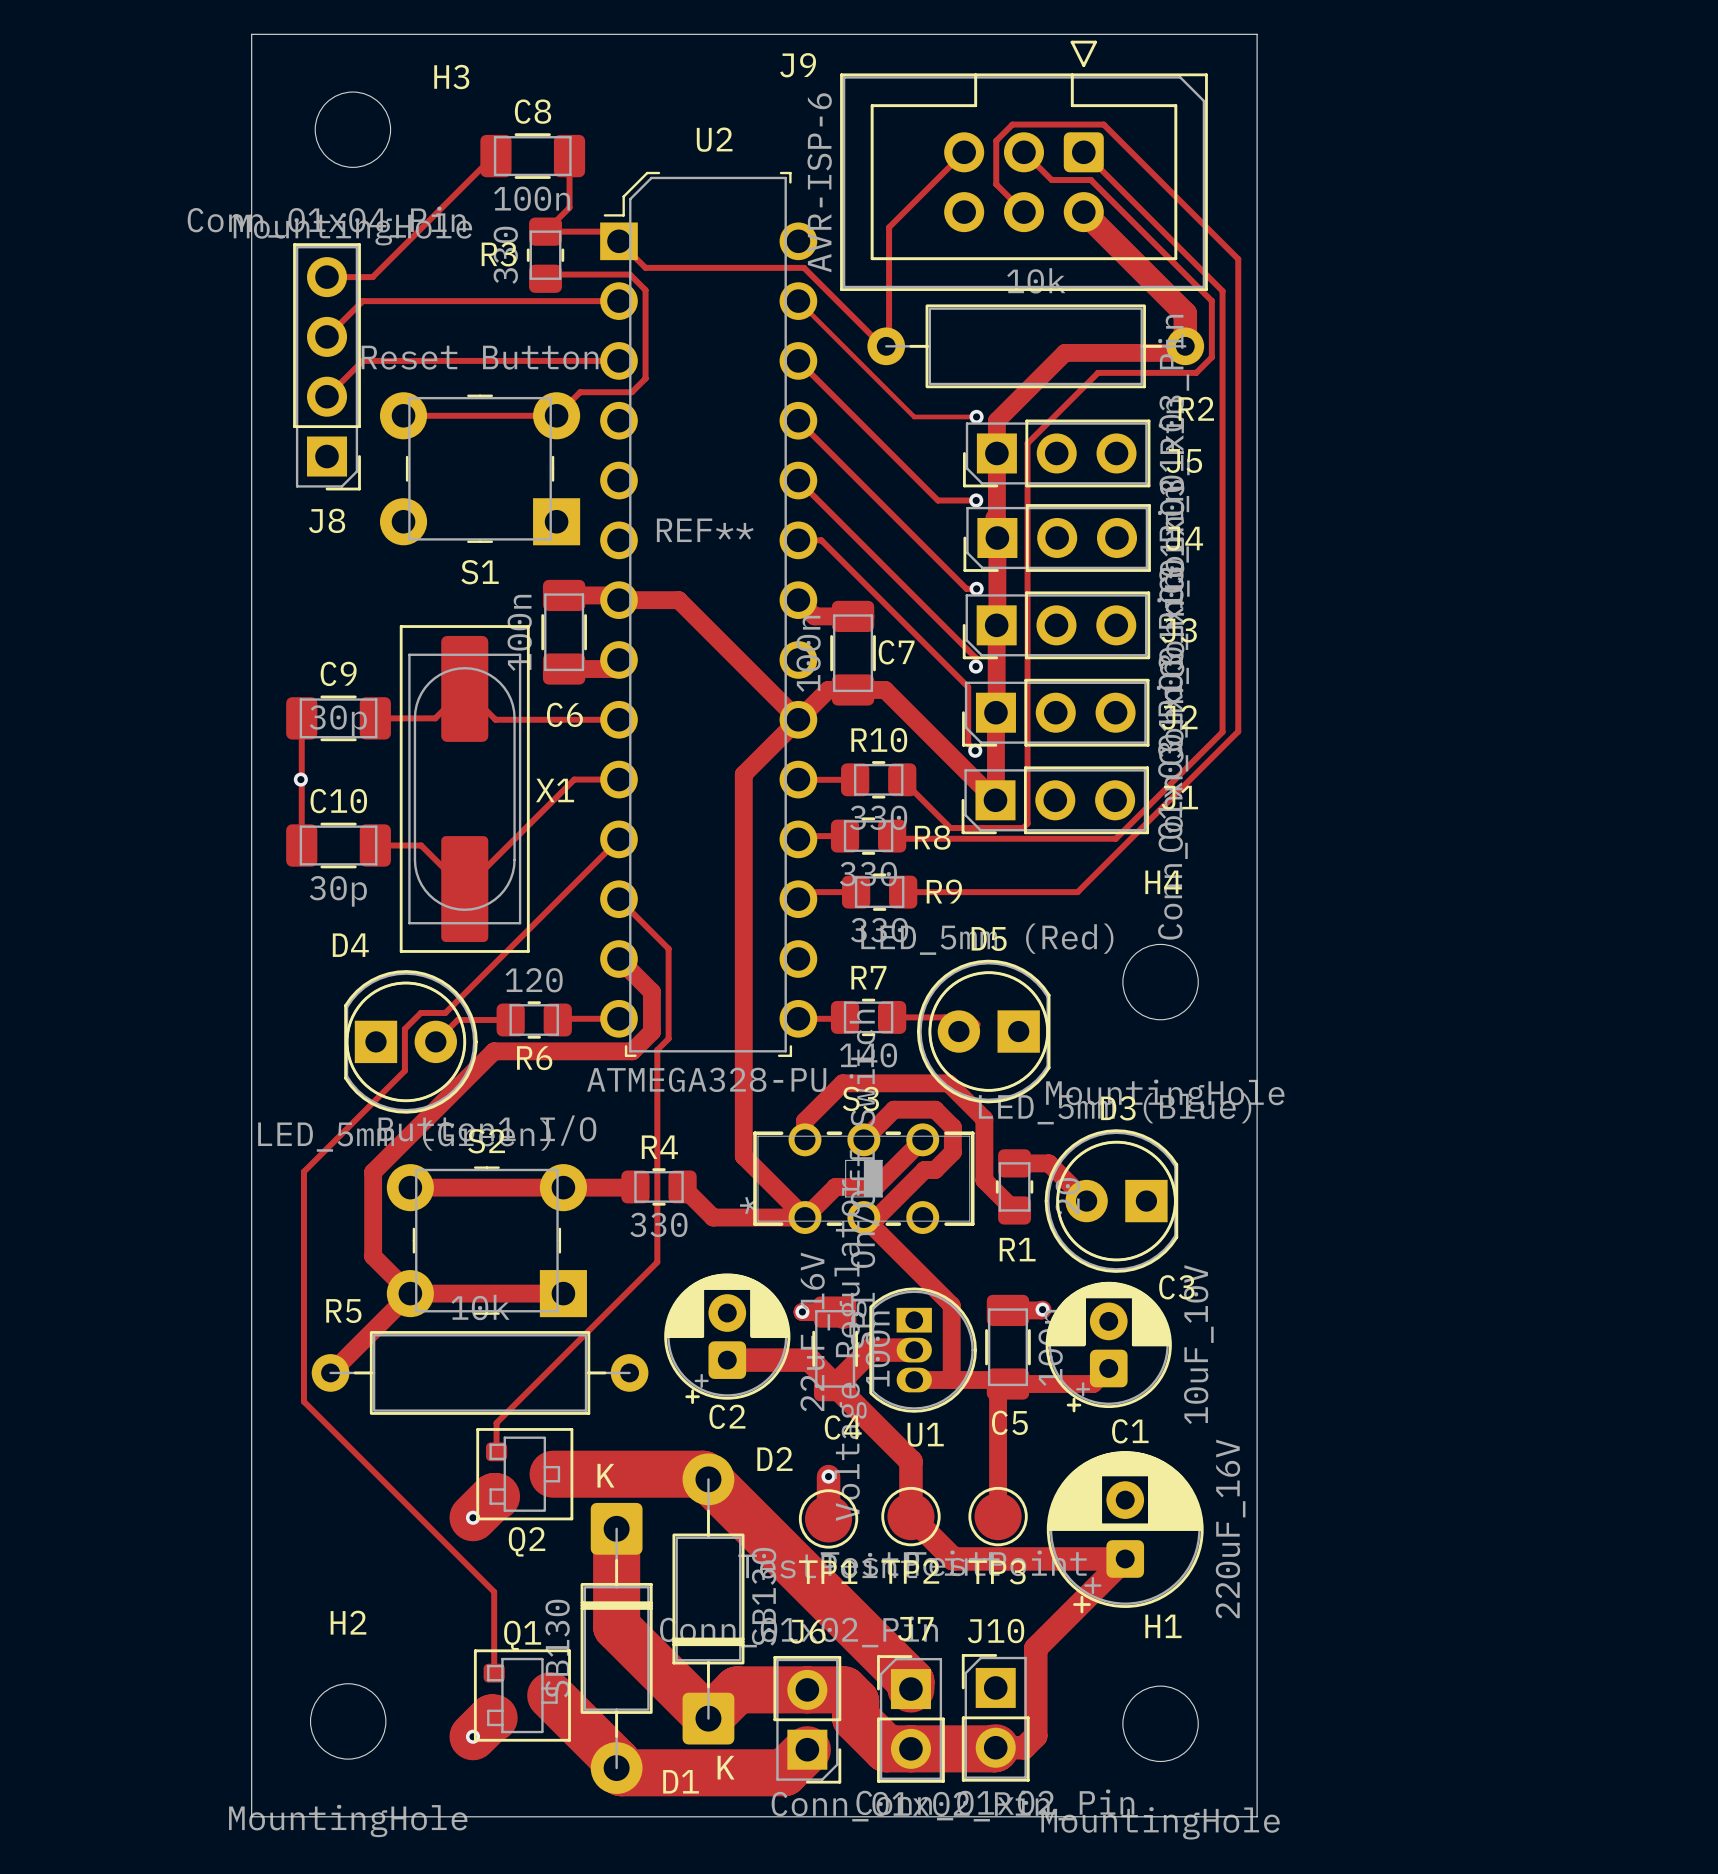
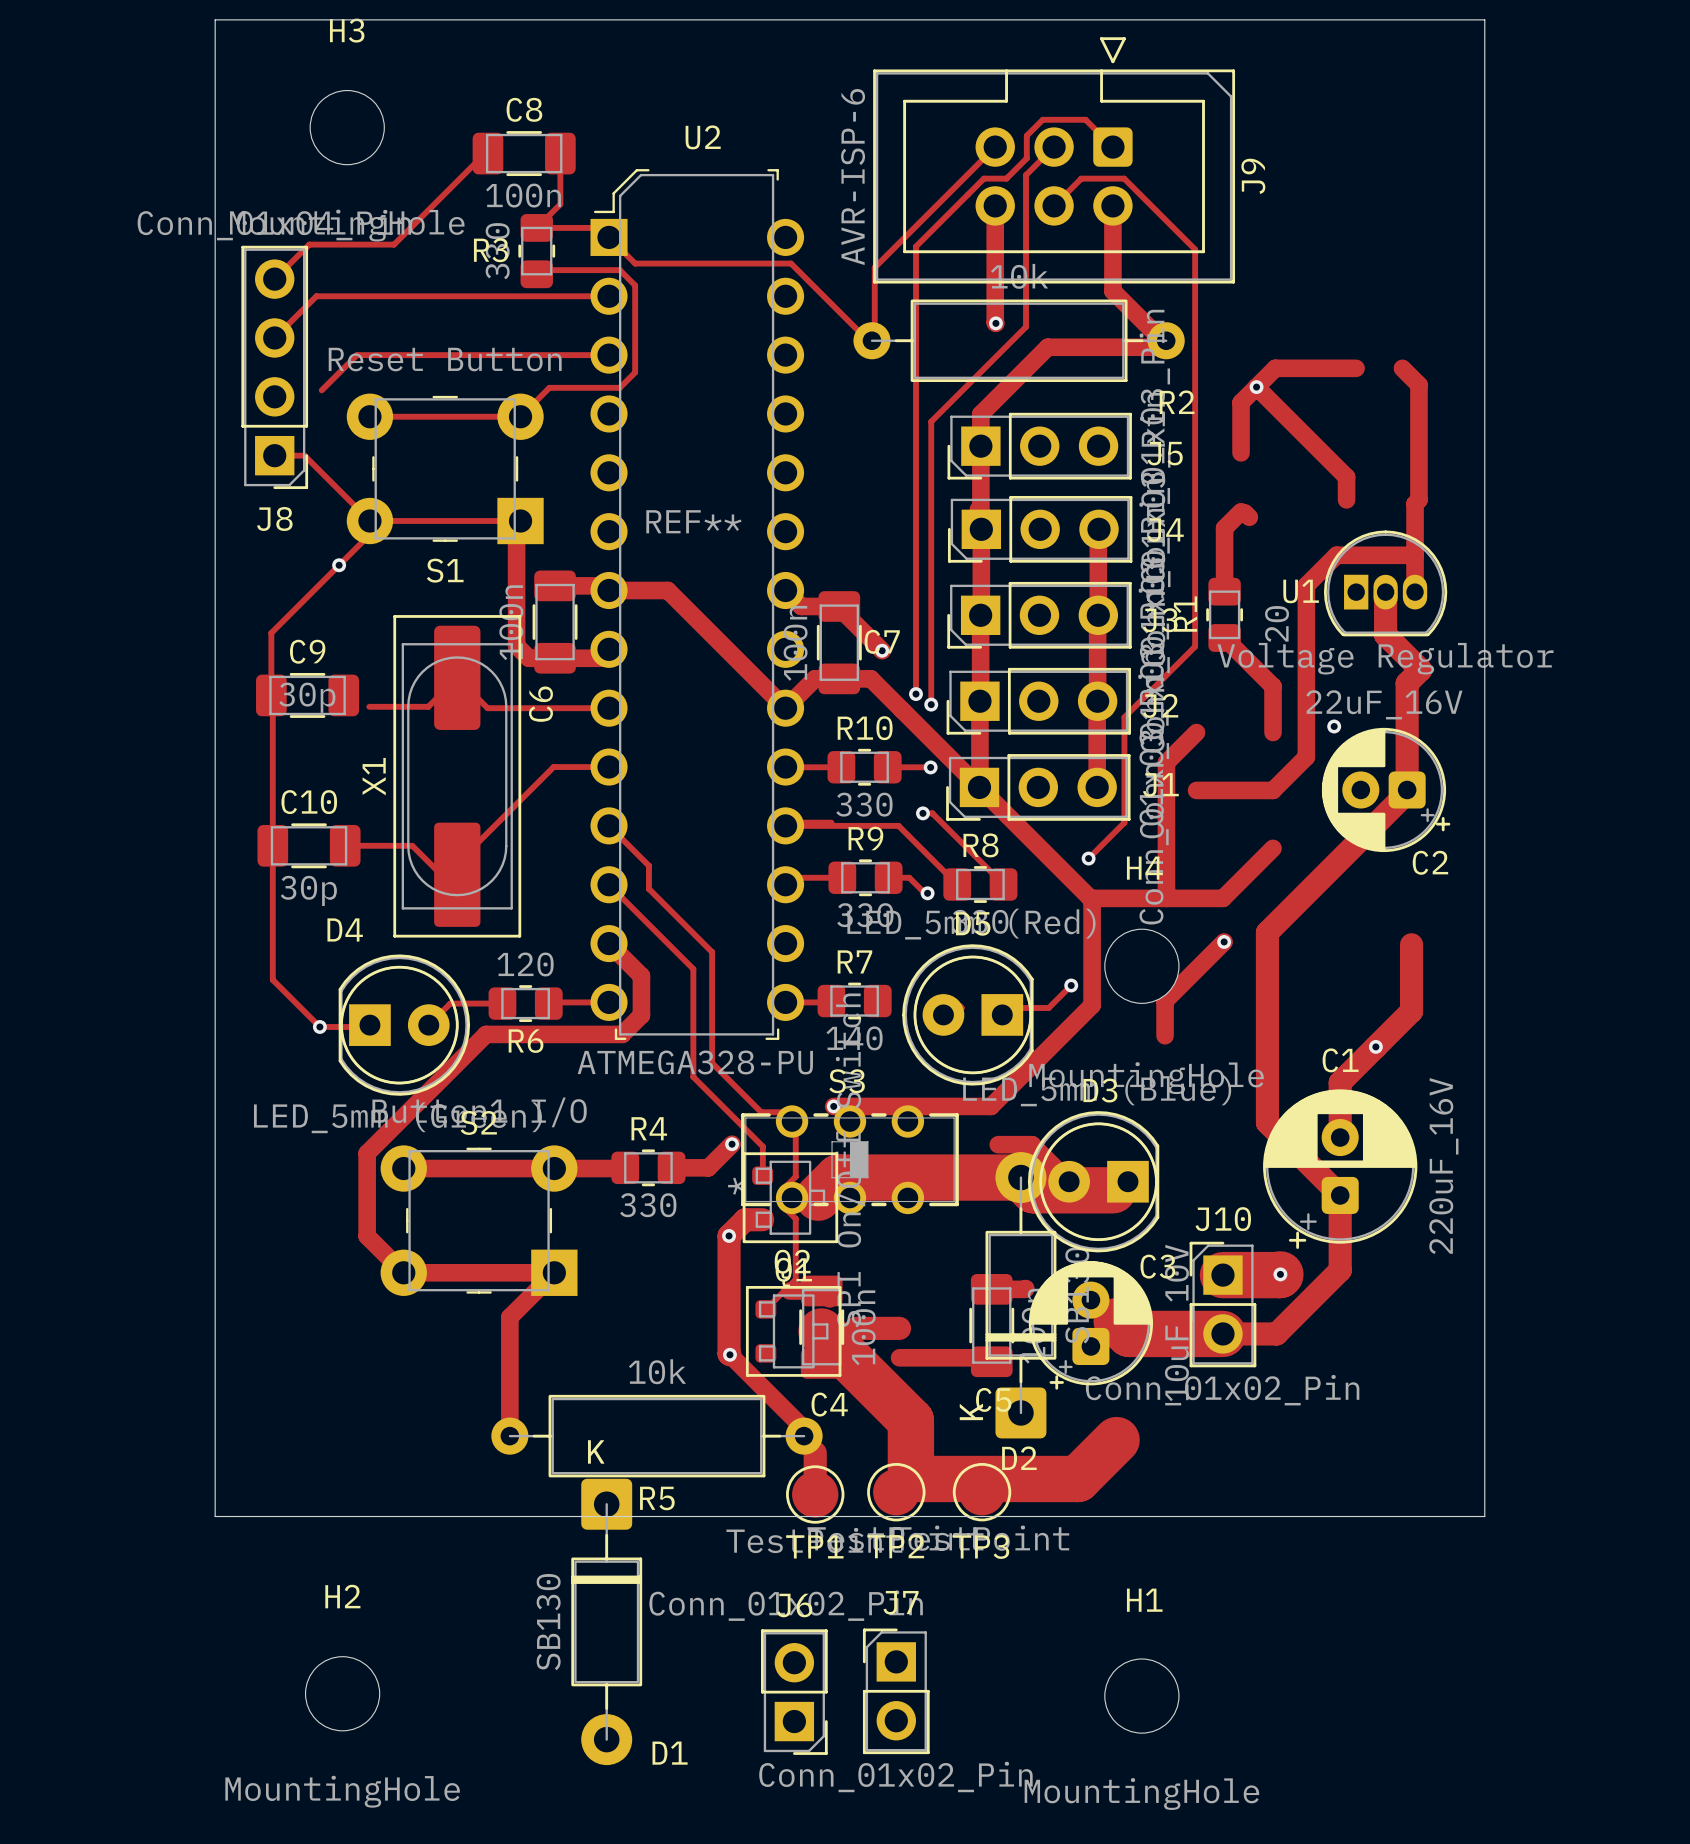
board edge: (251, 34) (1257, 34) (1257, 1816) (251, 1816) (251, 34) -> (215, 19) (215, 1516) (1484, 1516) (1484, 19) (215, 19)
J9 name rotation: 0° (798, 65) -> 90° counterclockwise (1253, 176)
J9 name position: J9 (798, 65) -> J9 (1253, 176)
H3 name position: H3 (451, 77) -> H3 (347, 30)
track: none -> (1054, 147) (1026, 175) (1026, 326) (931, 421) (931, 704)
track: none -> (1112, 147) (1085, 119) (1042, 119) (1026, 135) (1026, 158) (1006, 178) (983, 178) (916, 246) (916, 694)
track: (964, 152) (889, 227) (889, 271) -> (995, 147) (874, 267)
track: (1023, 152) (1051, 180) (1090, 180) (1211, 300) (1211, 357) (1196, 372) (1098, 372) (1027, 443) (1027, 823) (1023, 828) (950, 828) (902, 779) -> (930, 767) (887, 767)
track: (1083, 152) (1222, 291) (1222, 732) (1115, 838) (894, 838) (892, 836) -> none
track: (493, 156) (372, 277) (327, 277) -> (485, 153) (394, 244) (309, 244) (274, 279)
J9 position: (1023, 165) -> (1054, 160)
track: none -> (995, 205) (995, 323)
track: none -> (1054, 205) (1081, 178) (1124, 178) (1195, 249) (1195, 646) (1124, 717) (1124, 822) (1088, 858)
track: none -> (1112, 205) (1112, 291) (1168, 347)
track: (1023, 212) (996, 184) (996, 140) (1012, 124) (1103, 124) (1238, 259) (1238, 731) (1077, 892) (924, 892) -> (927, 893) (924, 893) (909, 877)
track: (1083, 212) (1185, 313) (1185, 346) -> none
track: (362, 301) (327, 336) -> (356, 296) (316, 296) (274, 337)
track: (798, 301) (914, 416) (976, 416) -> none
via: none -> (995, 323)
track: (798, 360) (937, 500) (976, 500) -> none
J8 position: (327, 366) -> (274, 367)
track: none -> (1356, 368) (1275, 368) (1241, 402) (1241, 452)
track: none -> (1402, 368) (1418, 384) (1418, 499) (1415, 503) (1415, 592)
track: (631, 392) (580, 392) (556, 415) (403, 415) -> (621, 385) (619, 387) (549, 387) (520, 416) (369, 416)
track: none -> (1256, 387) (1346, 477) (1346, 499)
via: none -> (1256, 387)
via: (976, 416) -> none
track: (798, 420) (966, 588) (976, 588) -> none
track: none -> (274, 455) (304, 455) (369, 521)
S1 position: (480, 468) -> (445, 468)
track: (798, 480) (975, 658) (975, 666) -> none
via: (976, 500) -> none
track: none -> (1241, 511) (1224, 528) (1224, 591)
track: none -> (1244, 512) (1249, 517)
track: none -> (369, 521) (369, 534) (271, 633) (272, 979) (319, 1026) (368, 1026)
track: none -> (369, 521) (520, 521) (516, 524) (516, 645) (528, 658) (555, 658)
track: none -> (1098, 530) (1098, 615)
track: (798, 540) (821, 540) (968, 687) (968, 743) (975, 750) -> none
track: none -> (1415, 555) (1336, 555) (1306, 585) (1306, 757) (1273, 790) (1196, 790)
via: none -> (339, 565)
via: (976, 588) -> none
track: none -> (1385, 592) (1385, 634) (1420, 669) (1407, 683) (1407, 792) (1267, 932) (1267, 1122) (1340, 1195) (1340, 1270) (1276, 1333) (1129, 1333) (1116, 1321)
track: none -> (839, 607) (882, 650)
track: none -> (1097, 615) (1097, 701)
track: none -> (1224, 637) (1273, 686) (1273, 732)
via: none -> (882, 650)
via: (975, 666) -> none
via: none -> (916, 694)
track: none -> (1097, 701) (1097, 787)
C6 name rotation: 0° (564, 714) -> 90° counterclockwise (540, 704)
via: none -> (931, 704)
track: (301, 718) (301, 845) -> none
C9 position: (338, 718) -> (307, 695)
track: (798, 719) (743, 774) (743, 1156) (805, 1217) -> none
via: none -> (1334, 726)
track: none -> (1196, 732) (1166, 762) (1166, 898)
via: (975, 750) -> none
via: (300, 779) -> none
track: (574, 779) (464, 889) (421, 845) (375, 845) -> (565, 767) (553, 767) (443, 877) (412, 845) (345, 845)
via: none -> (930, 767)
X1 name rotation: 0° (555, 790) -> 90° counterclockwise (374, 776)
X1 name position: X1 (555, 790) -> X1 (374, 776)
track: none -> (979, 787) (1090, 898) (1222, 898) (1273, 848)
track: none -> (922, 813) (932, 813) (1003, 884)
via: none -> (922, 813)
R8 position: (868, 836) -> (980, 884)
R8 name position: R8 (932, 837) -> R8 (980, 845)
track: (618, 839) (445, 1012) (420, 1012) (404, 1028) (404, 1070) (303, 1171) (303, 1401) (494, 1591) (494, 1673) -> (609, 825) (648, 865) (648, 888) (712, 952) (712, 1063) (761, 1112) (795, 1112) (795, 1176) (787, 1184) (787, 1210) (795, 1218) (795, 1279) (765, 1309)
track: none -> (785, 825) (898, 825) (957, 884)
C10 position: (338, 845) -> (309, 845)
via: none -> (1088, 858)
R9 name position: R9 (944, 891) -> R9 (865, 838)
via: none -> (927, 893)
track: none -> (1092, 898) (1092, 1005) (990, 1106) (833, 1106)
track: (668, 948) (668, 1038) (657, 1050) (657, 1262) (496, 1423) (496, 1451) -> (657, 933) (693, 969) (693, 1077) (762, 1146) (762, 1175)
track: none -> (1224, 941) (1165, 1001) (1165, 1035)
via: none -> (1224, 941)
track: none -> (1411, 944) (1411, 1011) (1340, 1082) (1340, 1137)
track: none -> (1071, 985) (1048, 1007) (1020, 1007)
via: none -> (1071, 985)
track: (892, 1017) (944, 1017) (958, 1031) -> none
via: none -> (319, 1026)
via: none -> (1375, 1046)
via: none -> (833, 1106)
track: (805, 1139) (805, 1121) (842, 1083) (948, 1083) (984, 1119) (984, 1180) (1014, 1210) -> none
track: (863, 1139) (893, 1109) (935, 1109) (952, 1127) (952, 1152) (935, 1169) (924, 1169) (877, 1217) (863, 1217) (951, 1305) (951, 1380) -> none
track: (922, 1139) (875, 1186) (835, 1186) (805, 1217) -> none
via: none -> (732, 1144)
track: (682, 1186) (713, 1217) (805, 1217) -> (671, 1167) (708, 1167) (732, 1144)
R1 position: (1014, 1186) -> (1224, 614)
track: none -> (1113, 1190) (1033, 1190) (1020, 1177) (838, 1177) (818, 1197)
track: none -> (762, 1219) (745, 1219) (729, 1235) (729, 1353) (804, 1428) (804, 1436)
R1 name rotation: 0° (1017, 1249) -> 90° counterclockwise (1185, 614)
R1 name position: R1 (1017, 1249) -> R1 (1185, 614)
via: none -> (729, 1235)
track: (410, 1293) (330, 1372) -> none
track: none -> (554, 1272) (509, 1317) (509, 1436)
track: none -> (1280, 1274) (1222, 1275)
via: none -> (1280, 1274)
via: (1042, 1309) -> none
R5 name position: R5 (343, 1311) -> R5 (657, 1498)
via: (802, 1311) -> none
C2 rotation: 0° (727, 1338) -> 90° counterclockwise (1386, 789)
C2 position: (727, 1338) -> (1386, 789)
U1 rotation: 0° (923, 1350) -> 90° counterclockwise (1385, 583)
U1 position: (923, 1350) -> (1385, 583)
track: none -> (821, 1331) (910, 1420) (910, 1478) (1077, 1478) (1116, 1440)
track: (727, 1360) (809, 1360) (910, 1461) (910, 1516) (953, 1558) (1125, 1558) (1035, 1648) (1035, 1736) (1024, 1747) (886, 1748) (855, 1718) (855, 1701) (844, 1689) (737, 1689) (708, 1718) (616, 1626) (616, 1528) -> none
track: (1108, 1368) (1093, 1384) (1007, 1384) (998, 1393) (998, 1516) -> none
R5 position: (480, 1372) -> (656, 1436)
via: none -> (729, 1354)
C1 name position: C1 (1130, 1431) -> C1 (1340, 1060)
U1 name position: U1 (925, 1434) -> U1 (1301, 591)
D2 footprint: [672, 1453, 745, 1745] -> [985, 1152, 1057, 1439]
D2 name position: D2 (774, 1458) -> D2 (1019, 1458)
Q2 position: (524, 1474) -> (790, 1197)
track: (553, 1474) (703, 1474) (910, 1681) (910, 1689) -> none
via: (828, 1476) -> none
track: (496, 1496) (494, 1496) (473, 1517) -> none
via: (473, 1517) -> none
C1 position: (1125, 1532) -> (1340, 1169)
Q1 position: (522, 1695) -> (793, 1331)
track: (550, 1695) (616, 1761) (616, 1768) (621, 1772) (784, 1772) (807, 1749) -> none
track: (494, 1717) (491, 1717) (473, 1736) -> none
J10 position: (995, 1717) -> (1222, 1304)
via: (473, 1736) -> none

